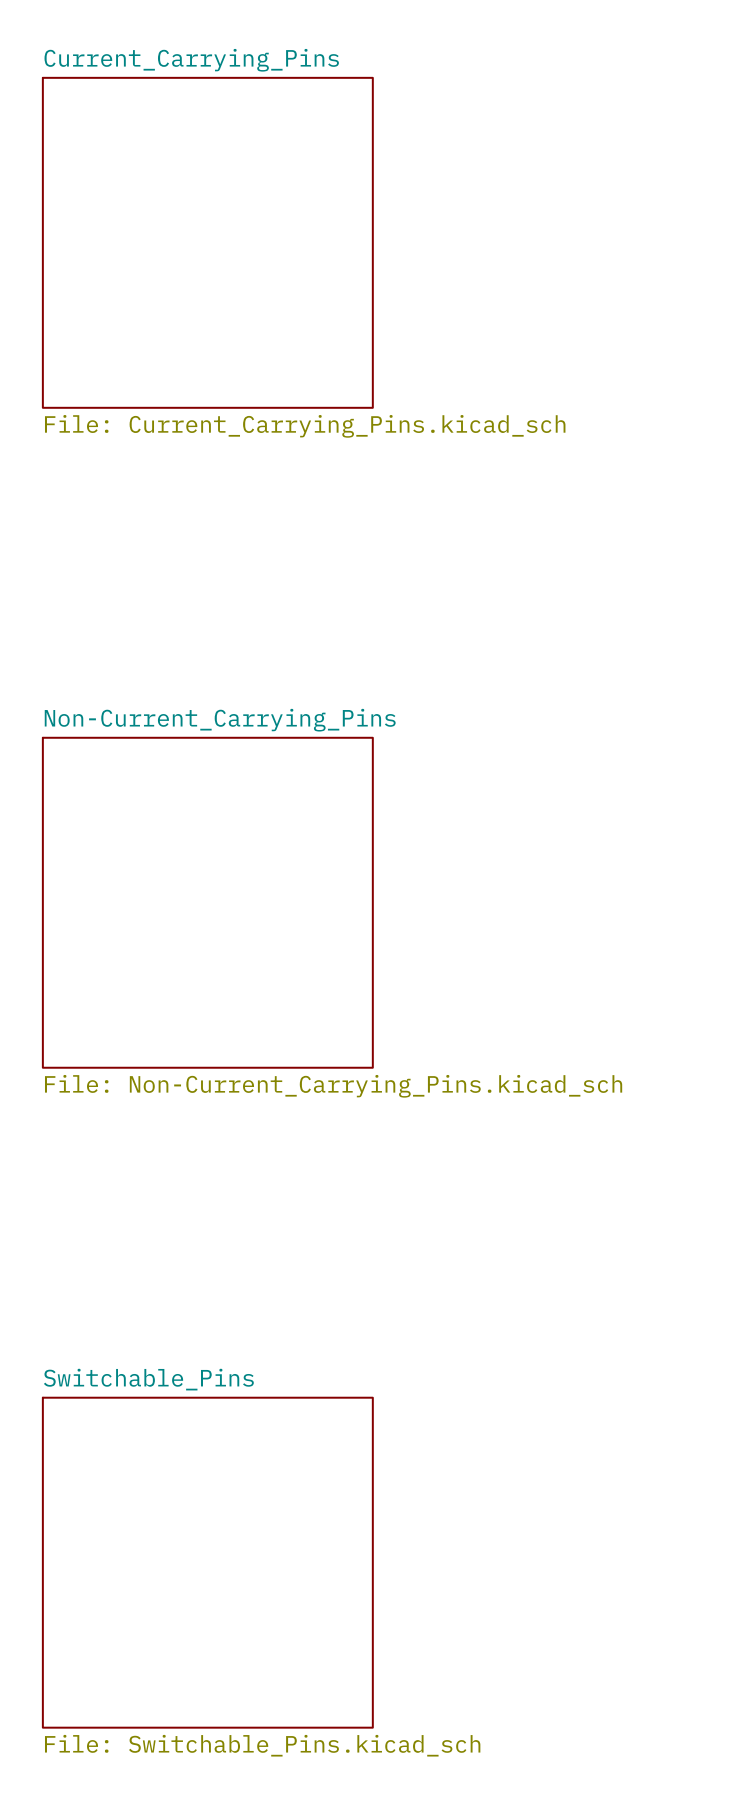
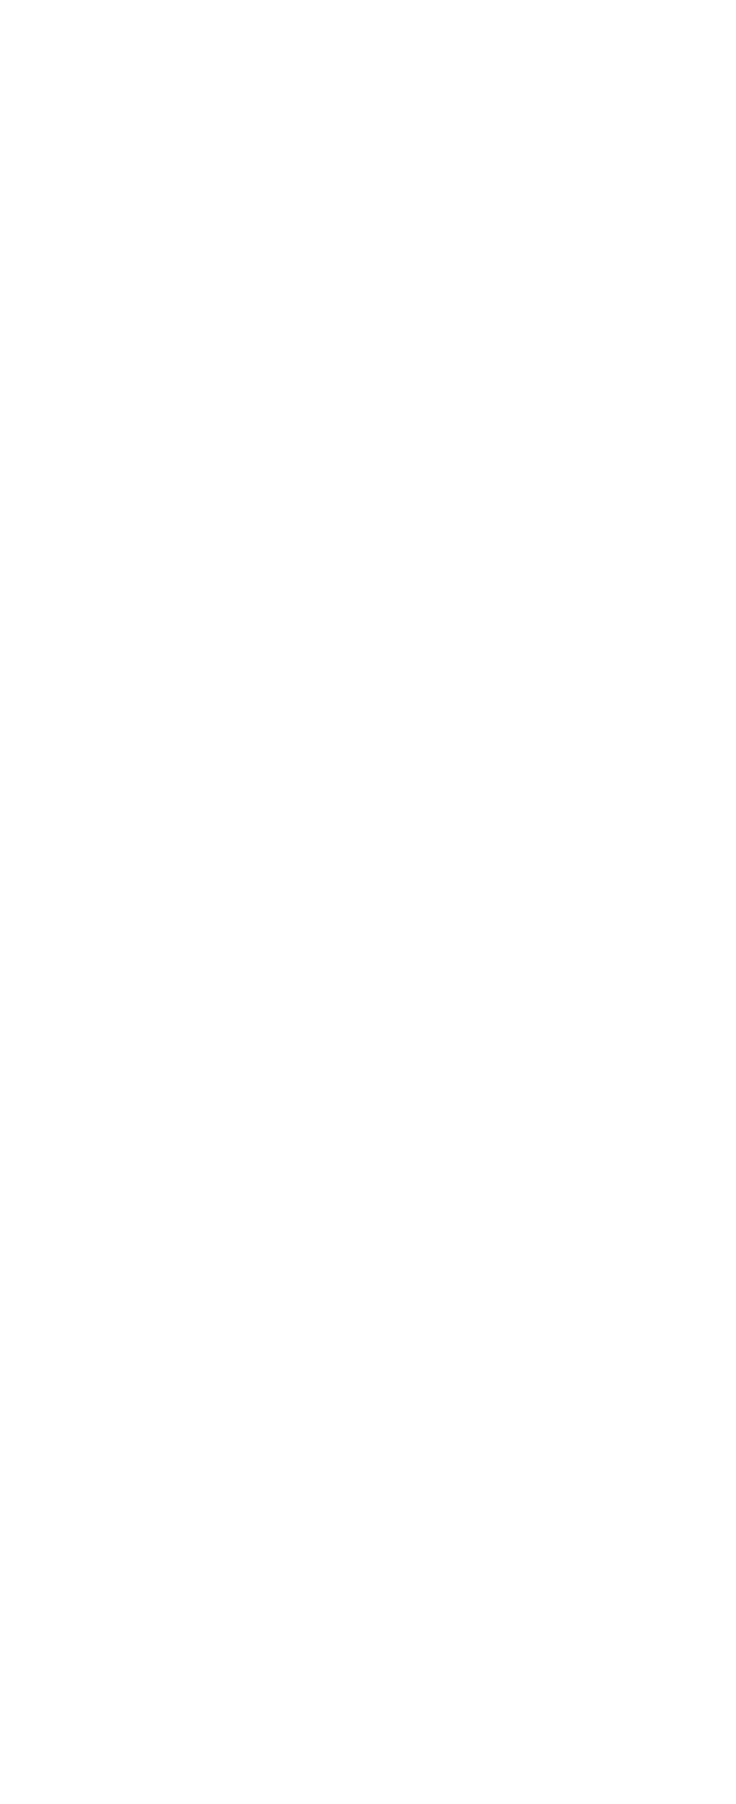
sheet Current_Carrying_Pins: File: Current_Carrying_Pins.kicad_sch (207, 242) -> none
sheet Non-Current_Carrying_Pins: File: Non-Current_Carrying_Pins.kicad_sch (207, 902) -> none
sheet Switchable_Pins: File: Switchable_Pins.kicad_sch (207, 1562) -> none

